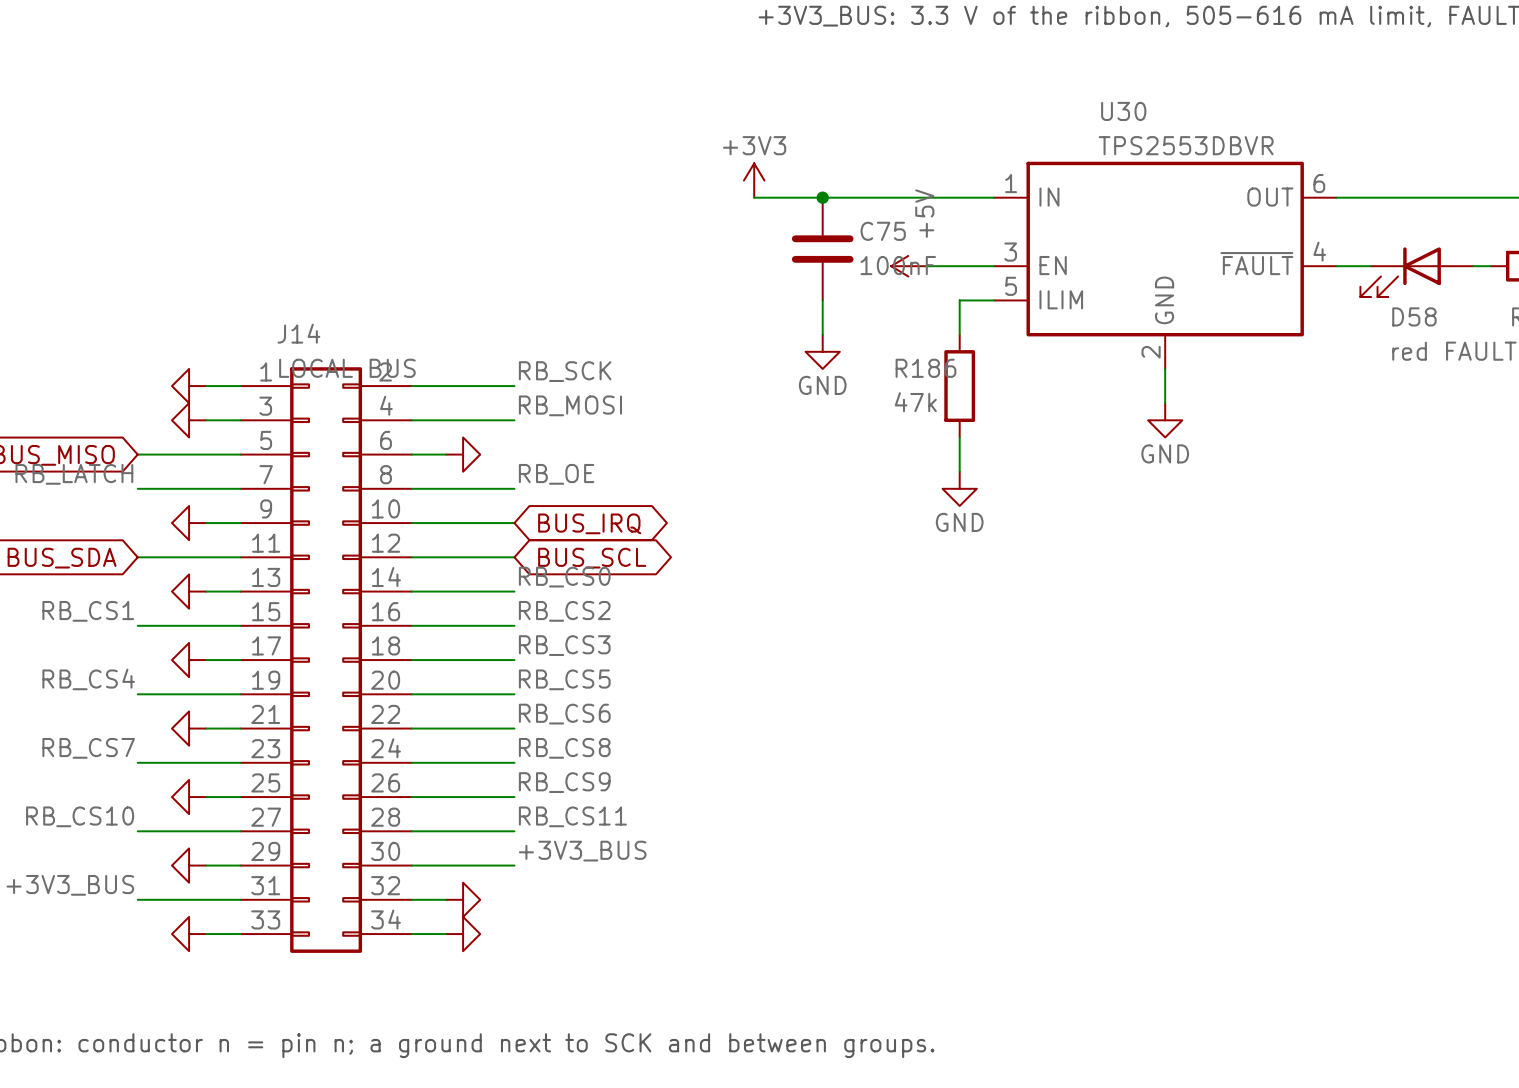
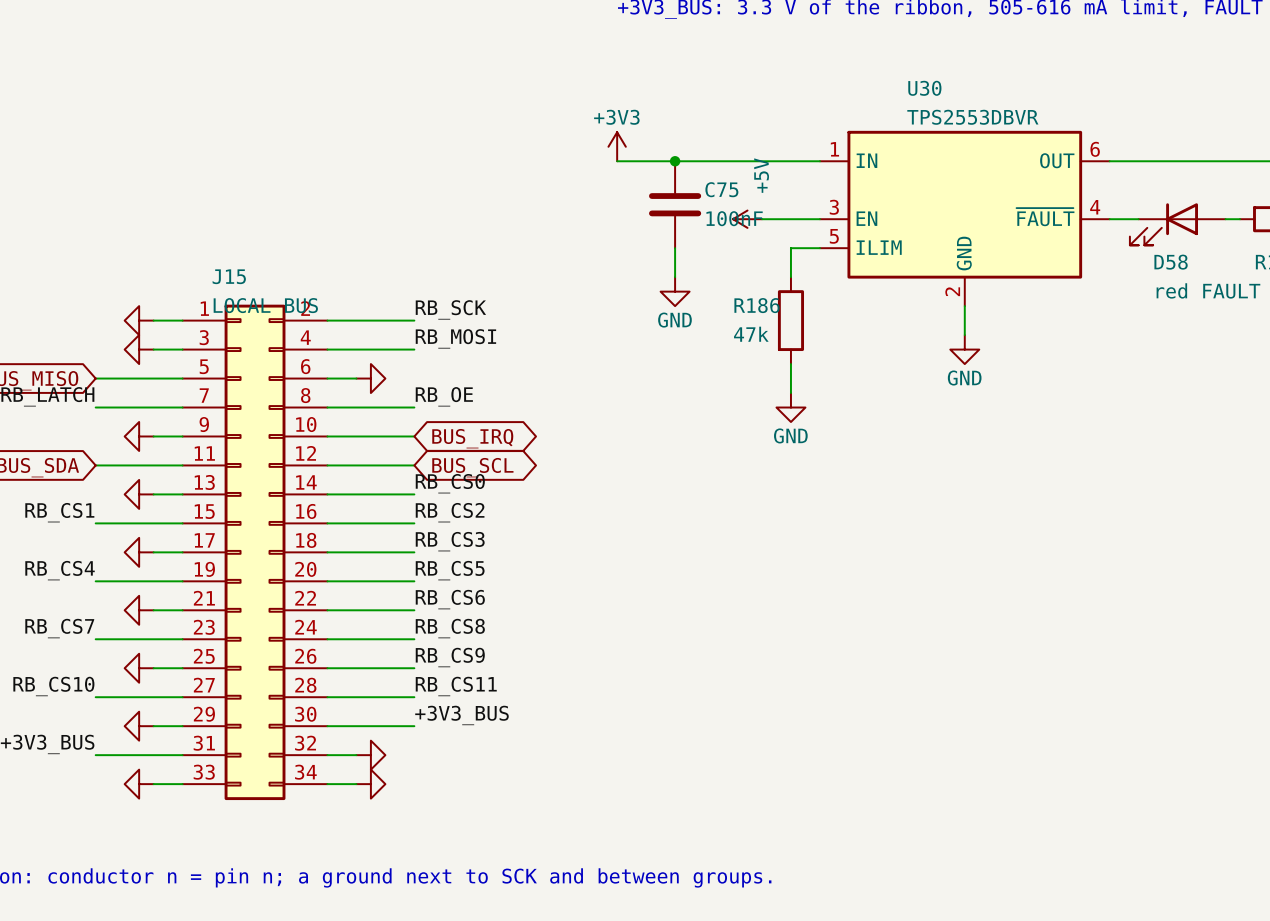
J14 name: J14 (298, 333) -> J15 (229, 276)

